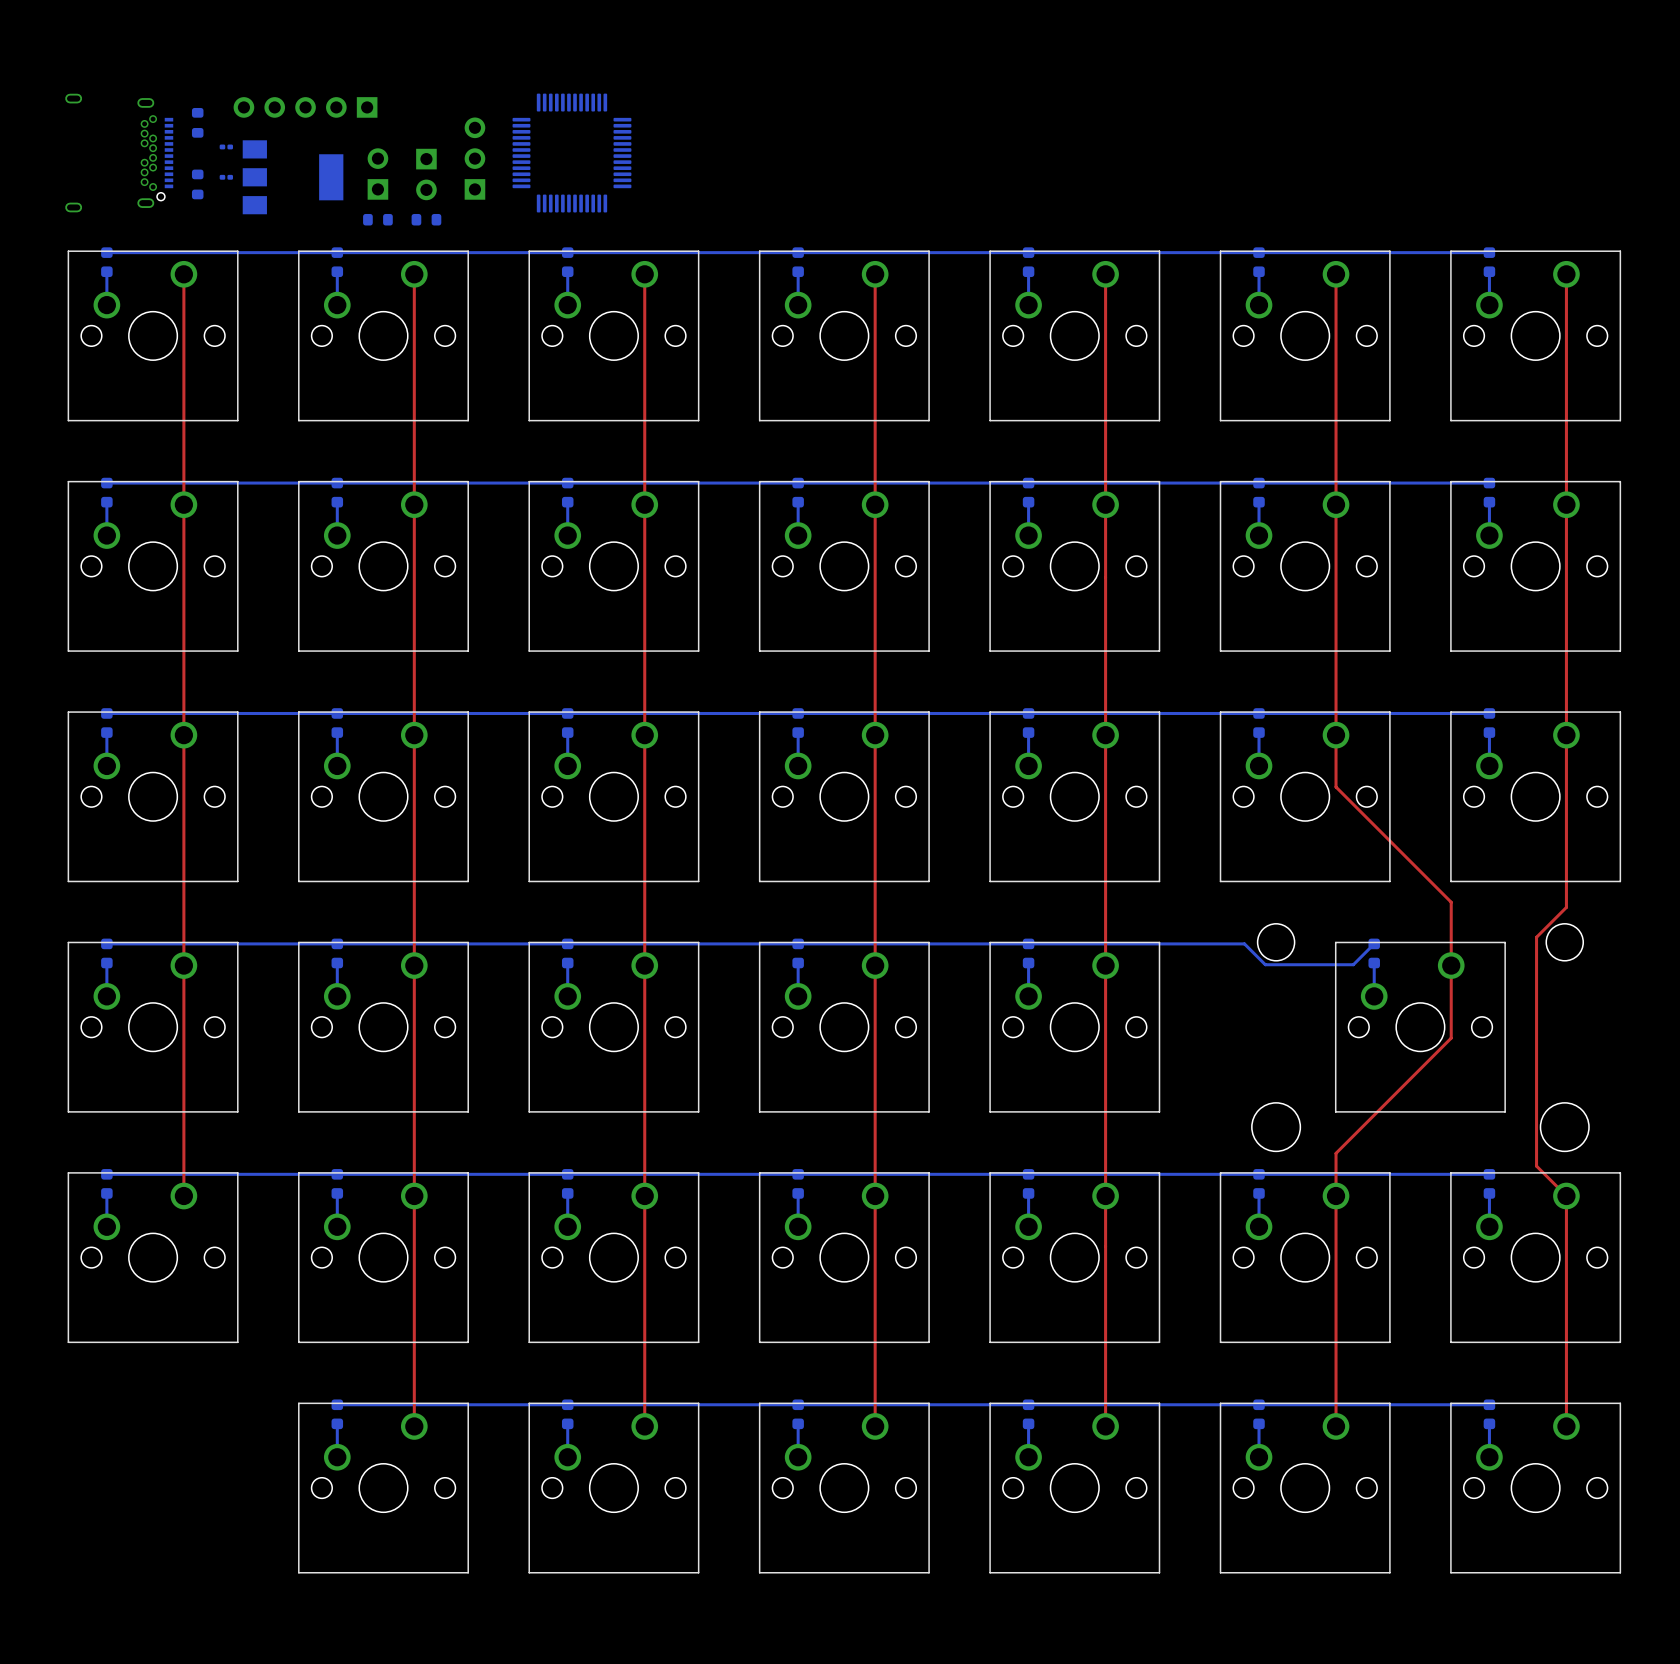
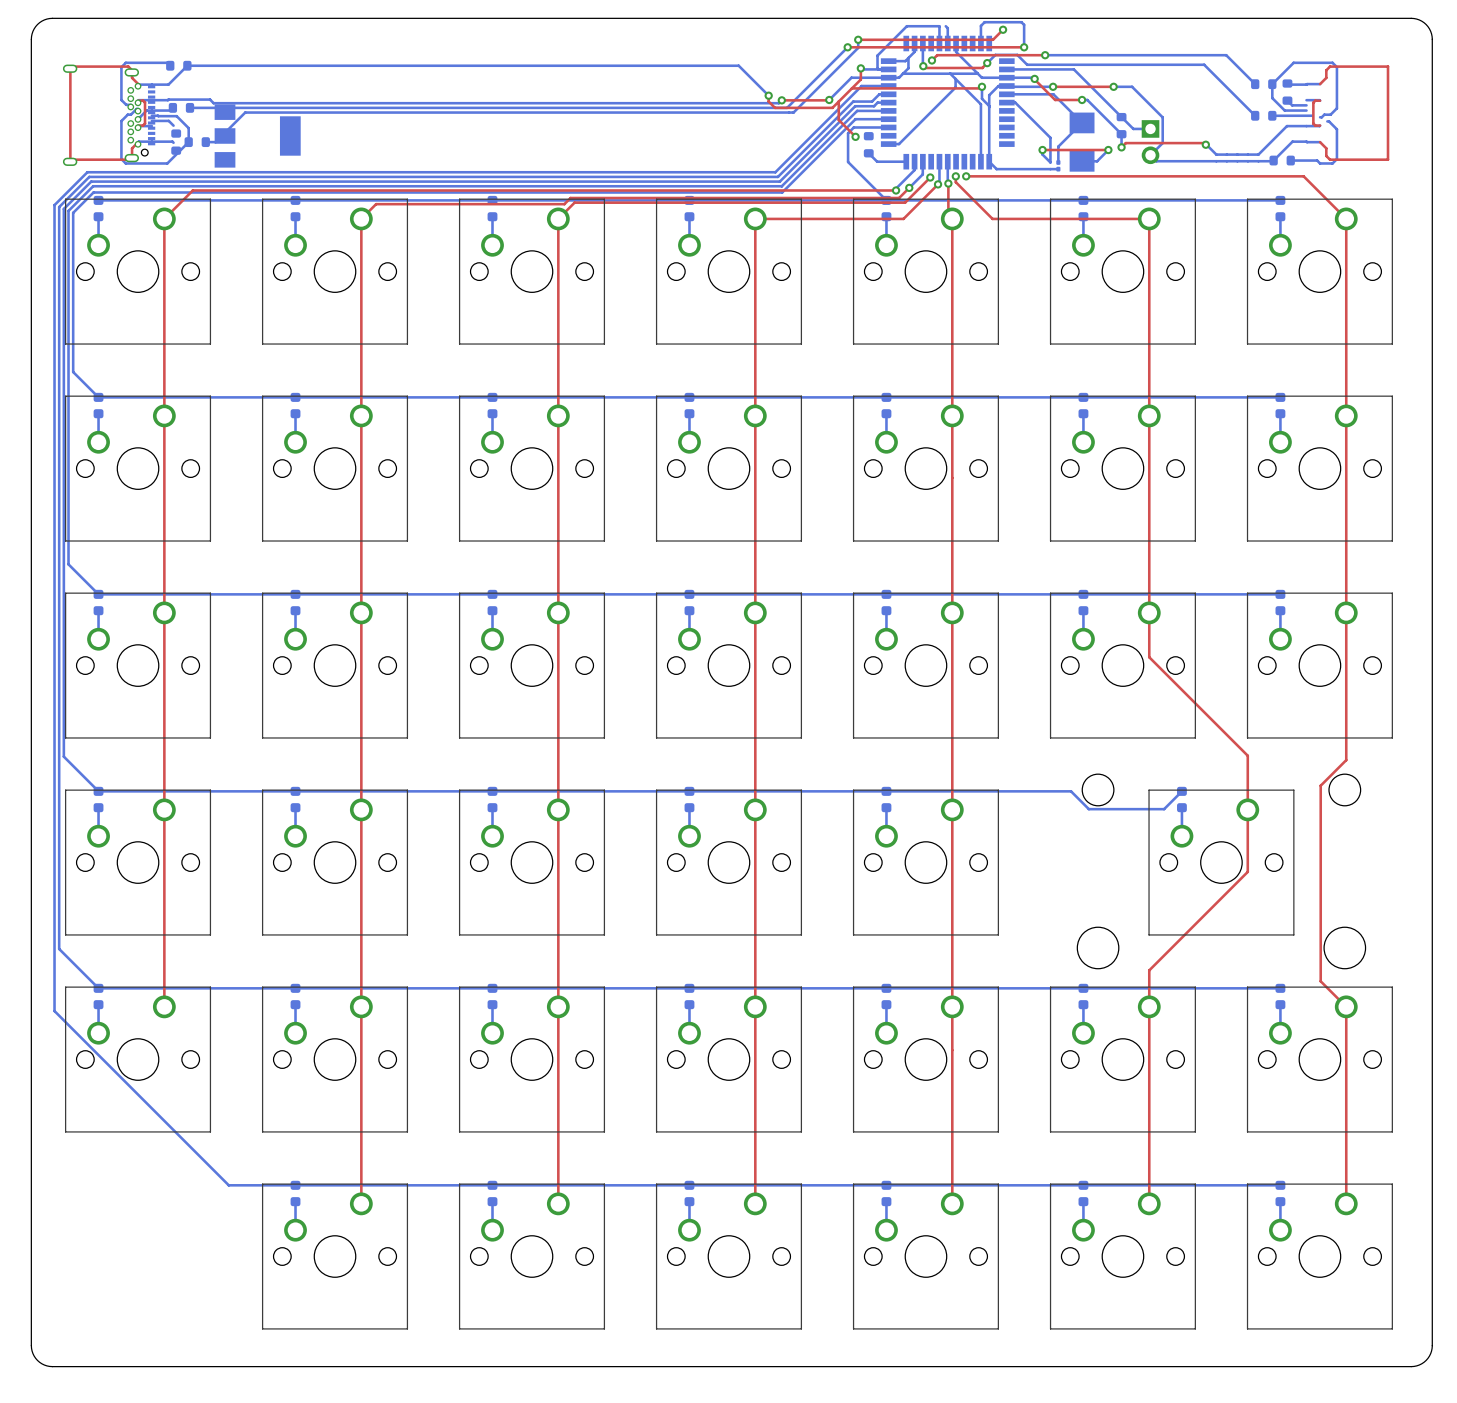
board edge: none -> (52, 18) (1411, 18) (1419, 19) (1426, 24) (1430, 31) (1432, 39) (1432, 1345) (1430, 1353) (1426, 1360) (1419, 1365) (1411, 1366) (52, 1366) (44, 1365) (37, 1360) (32, 1353) (31, 1345) (31, 39) (32, 31) (37, 24) (44, 19) (52, 18)
bottom track: none -> (945, 26) (947, 28) (947, 43)
top track: none -> (1003, 29) (993, 39) (858, 39)
via: none -> (1003, 29)
bottom track: none -> (858, 39) (858, 47) (793, 112) (245, 112) (215, 142) (205, 142)
via: none -> (858, 39)
bottom track: none -> (914, 43) (914, 51) (905, 61) (888, 61)
bottom track: none -> (922, 43) (923, 66)
bottom track: none -> (939, 43) (939, 26) (906, 26) (877, 55) (878, 69)
bottom track: none -> (956, 43) (956, 51) (981, 77) (1034, 78)
bottom track: none -> (980, 43) (980, 25) (984, 22) (1021, 22) (1024, 24) (1024, 47)
bottom track: none -> (847, 47) (787, 107) (190, 107)
top track: none -> (847, 47) (1024, 47)
via: none -> (847, 47)
via: none -> (1024, 47)
bottom track: none -> (1045, 55) (1226, 55) (1255, 84)
top track: none -> (1045, 55) (937, 55) (931, 60)
via: none -> (1045, 55)
bottom track: none -> (908, 58) (908, 68) (899, 77) (851, 77) (829, 99)
via: none -> (931, 60)
bottom track: none -> (987, 63) (995, 54) (1017, 54) (1027, 64) (1204, 64) (1255, 115)
top track: none -> (987, 63) (982, 67) (925, 67) (923, 66)
via: none -> (987, 63)
bottom track: none -> (170, 65) (167, 62) (125, 62) (121, 67) (121, 100) (126, 104) (131, 104)
part: none -> (178, 65)
via: none -> (923, 66)
bottom track: none -> (860, 68) (888, 69)
top track: none -> (860, 68) (860, 79) (832, 107) (775, 107) (768, 101) (768, 95)
via: none -> (860, 68)
bottom track: none -> (1006, 69) (1073, 69) (1133, 128) (1150, 128)
bottom track: none -> (977, 73) (903, 73)
bottom track: none -> (950, 73) (980, 104) (980, 161)
part: (305, 107) -> none
bottom track: none -> (955, 78) (955, 87) (899, 144) (888, 144)
top track: none -> (1034, 78) (1055, 99) (1082, 99)
via: none -> (1034, 78)
bottom track: none -> (1287, 83) (1320, 84)
bottom track: none -> (138, 84) (168, 84) (187, 65) (738, 65) (768, 95)
top track: none -> (138, 84) (132, 77) (132, 70) (128, 66) (70, 66) (70, 159) (128, 159) (132, 155) (132, 148) (138, 142)
part: none -> (1263, 84)
top track: none -> (1320, 84) (1326, 77) (1326, 70) (1330, 66) (1388, 66) (1388, 159) (1330, 159) (1326, 155) (1326, 148) (1320, 142)
bottom track: none -> (888, 86) (861, 86) (775, 172) (87, 172) (54, 205) (54, 1011) (228, 1185) (295, 1185)
bottom track: none -> (981, 86) (981, 98) (989, 106)
top track: none -> (981, 86) (980, 88) (851, 88)
via: none -> (981, 86)
bottom track: none -> (1053, 86) (998, 86) (989, 95) (989, 161) (996, 169) (1058, 169)
top track: none -> (1053, 86) (1113, 86)
via: none -> (1053, 86)
bottom track: none -> (1113, 86) (1132, 86) (1162, 117) (1162, 143) (1150, 155) (1156, 161) (1272, 161) (1292, 141) (1320, 142)
via: none -> (1113, 86)
part: (197, 122) -> none
part: none -> (1287, 92)
bottom track: none -> (888, 94) (879, 94) (872, 101) (853, 101) (777, 176) (89, 176) (59, 207) (59, 948) (98, 988)
bottom track: none -> (1006, 94) (1053, 94) (1082, 122) (1058, 146) (1058, 162)
via: none -> (768, 95)
bottom track: none -> (781, 100) (778, 103) (213, 103) (210, 99) (138, 100)
via: none -> (781, 100)
top track: none -> (829, 99) (781, 100)
via: none -> (829, 99)
bottom track: none -> (1082, 99) (1087, 99) (1121, 134) (1121, 147)
via: none -> (1082, 99)
bottom track: none -> (1287, 100) (1292, 105) (1306, 105)
bottom track: none -> (1306, 100) (1320, 100)
top track: none -> (138, 100) (145, 102) (145, 123) (138, 125)
top track: none -> (1320, 100) (1313, 102) (1313, 123) (1320, 125)
top track: none -> (838, 101) (838, 120) (855, 136)
bottom track: none -> (888, 102) (877, 102) (874, 106) (855, 106) (779, 181) (91, 181) (63, 208) (63, 756) (98, 791)
part: none -> (947, 102)
bottom track: none -> (1006, 102) (1015, 102) (1050, 137) (1050, 162) (1042, 154) (1042, 150)
bottom track: none -> (172, 107) (170, 110) (146, 110) (138, 117)
part: none -> (181, 107)
bottom track: none -> (138, 108) (121, 121) (121, 159) (125, 163) (167, 163) (188, 142) (188, 128) (176, 116) (151, 115)
part: (226, 146) -> none
bottom track: none -> (888, 110) (857, 110) (781, 186)
bottom track: none -> (1306, 110) (1284, 110) (1272, 98) (1272, 84) (1293, 62) (1332, 62) (1336, 67) (1336, 108) (1330, 114) (1320, 117)
part: (571, 153) -> none
part: none -> (1263, 115)
bottom track: none -> (1272, 115) (1312, 115)
bottom track: none -> (888, 119) (855, 119) (782, 192) (93, 192) (73, 212) (73, 372) (98, 397)
part: (474, 158) -> none
bottom track: none -> (151, 120) (168, 120) (173, 125)
bottom track: none -> (1327, 121) (1336, 129) (1336, 159) (1332, 163) (1320, 163) (1317, 160) (1290, 160)
bottom track: none -> (138, 125) (151, 126)
part: none -> (1121, 125)
bottom track: none -> (1320, 125) (1286, 126) (1258, 154) (1216, 154) (1205, 144)
bottom track: none -> (888, 127) (853, 127) (848, 133) (848, 162) (886, 200)
part footprint: [219, 174, 234, 180] -> [184, 137, 210, 148]
part: (377, 174) -> none
part: (426, 174) -> none
via: none -> (855, 136)
bottom track: none -> (138, 142) (173, 142)
part: none -> (1082, 142)
part: none -> (1150, 142)
part: none -> (868, 144)
top track: none -> (1205, 144) (1204, 143) (1125, 143) (1121, 147)
via: none -> (1205, 144)
via: none -> (1121, 147)
top track: none -> (1042, 150) (1108, 150)
via: none -> (1042, 150)
bottom track: none -> (1108, 150) (1097, 161) (1082, 161)
via: none -> (1108, 150)
bottom track: none -> (868, 153) (877, 161) (906, 161)
part: none -> (1282, 160)
bottom track: none -> (914, 161) (914, 170) (896, 190)
bottom track: none -> (922, 161) (922, 174) (909, 187)
bottom track: none -> (939, 161) (938, 184)
bottom track: none -> (947, 161) (948, 183)
part: none -> (1058, 165)
part: (377, 219) -> none
part: (426, 219) -> none
top track: none -> (955, 176) (955, 182) (992, 218) (1149, 218)
via: none -> (955, 176)
top track: none -> (966, 176) (1303, 176) (1346, 218)
via: none -> (966, 176)
top track: none -> (930, 177) (905, 202) (574, 202) (558, 218)
via: none -> (930, 177)
top track: none -> (948, 183) (948, 215) (952, 218)
via: none -> (948, 183)
top track: none -> (938, 184) (903, 218) (755, 218)
via: none -> (938, 184)
bottom track: none -> (781, 186) (93, 186) (68, 210) (68, 564) (98, 594)
top track: none -> (909, 187) (899, 198) (570, 198) (564, 204) (376, 204) (361, 218)
via: none -> (909, 187)
top track: none -> (896, 190) (192, 190) (164, 218)
via: none -> (896, 190)

